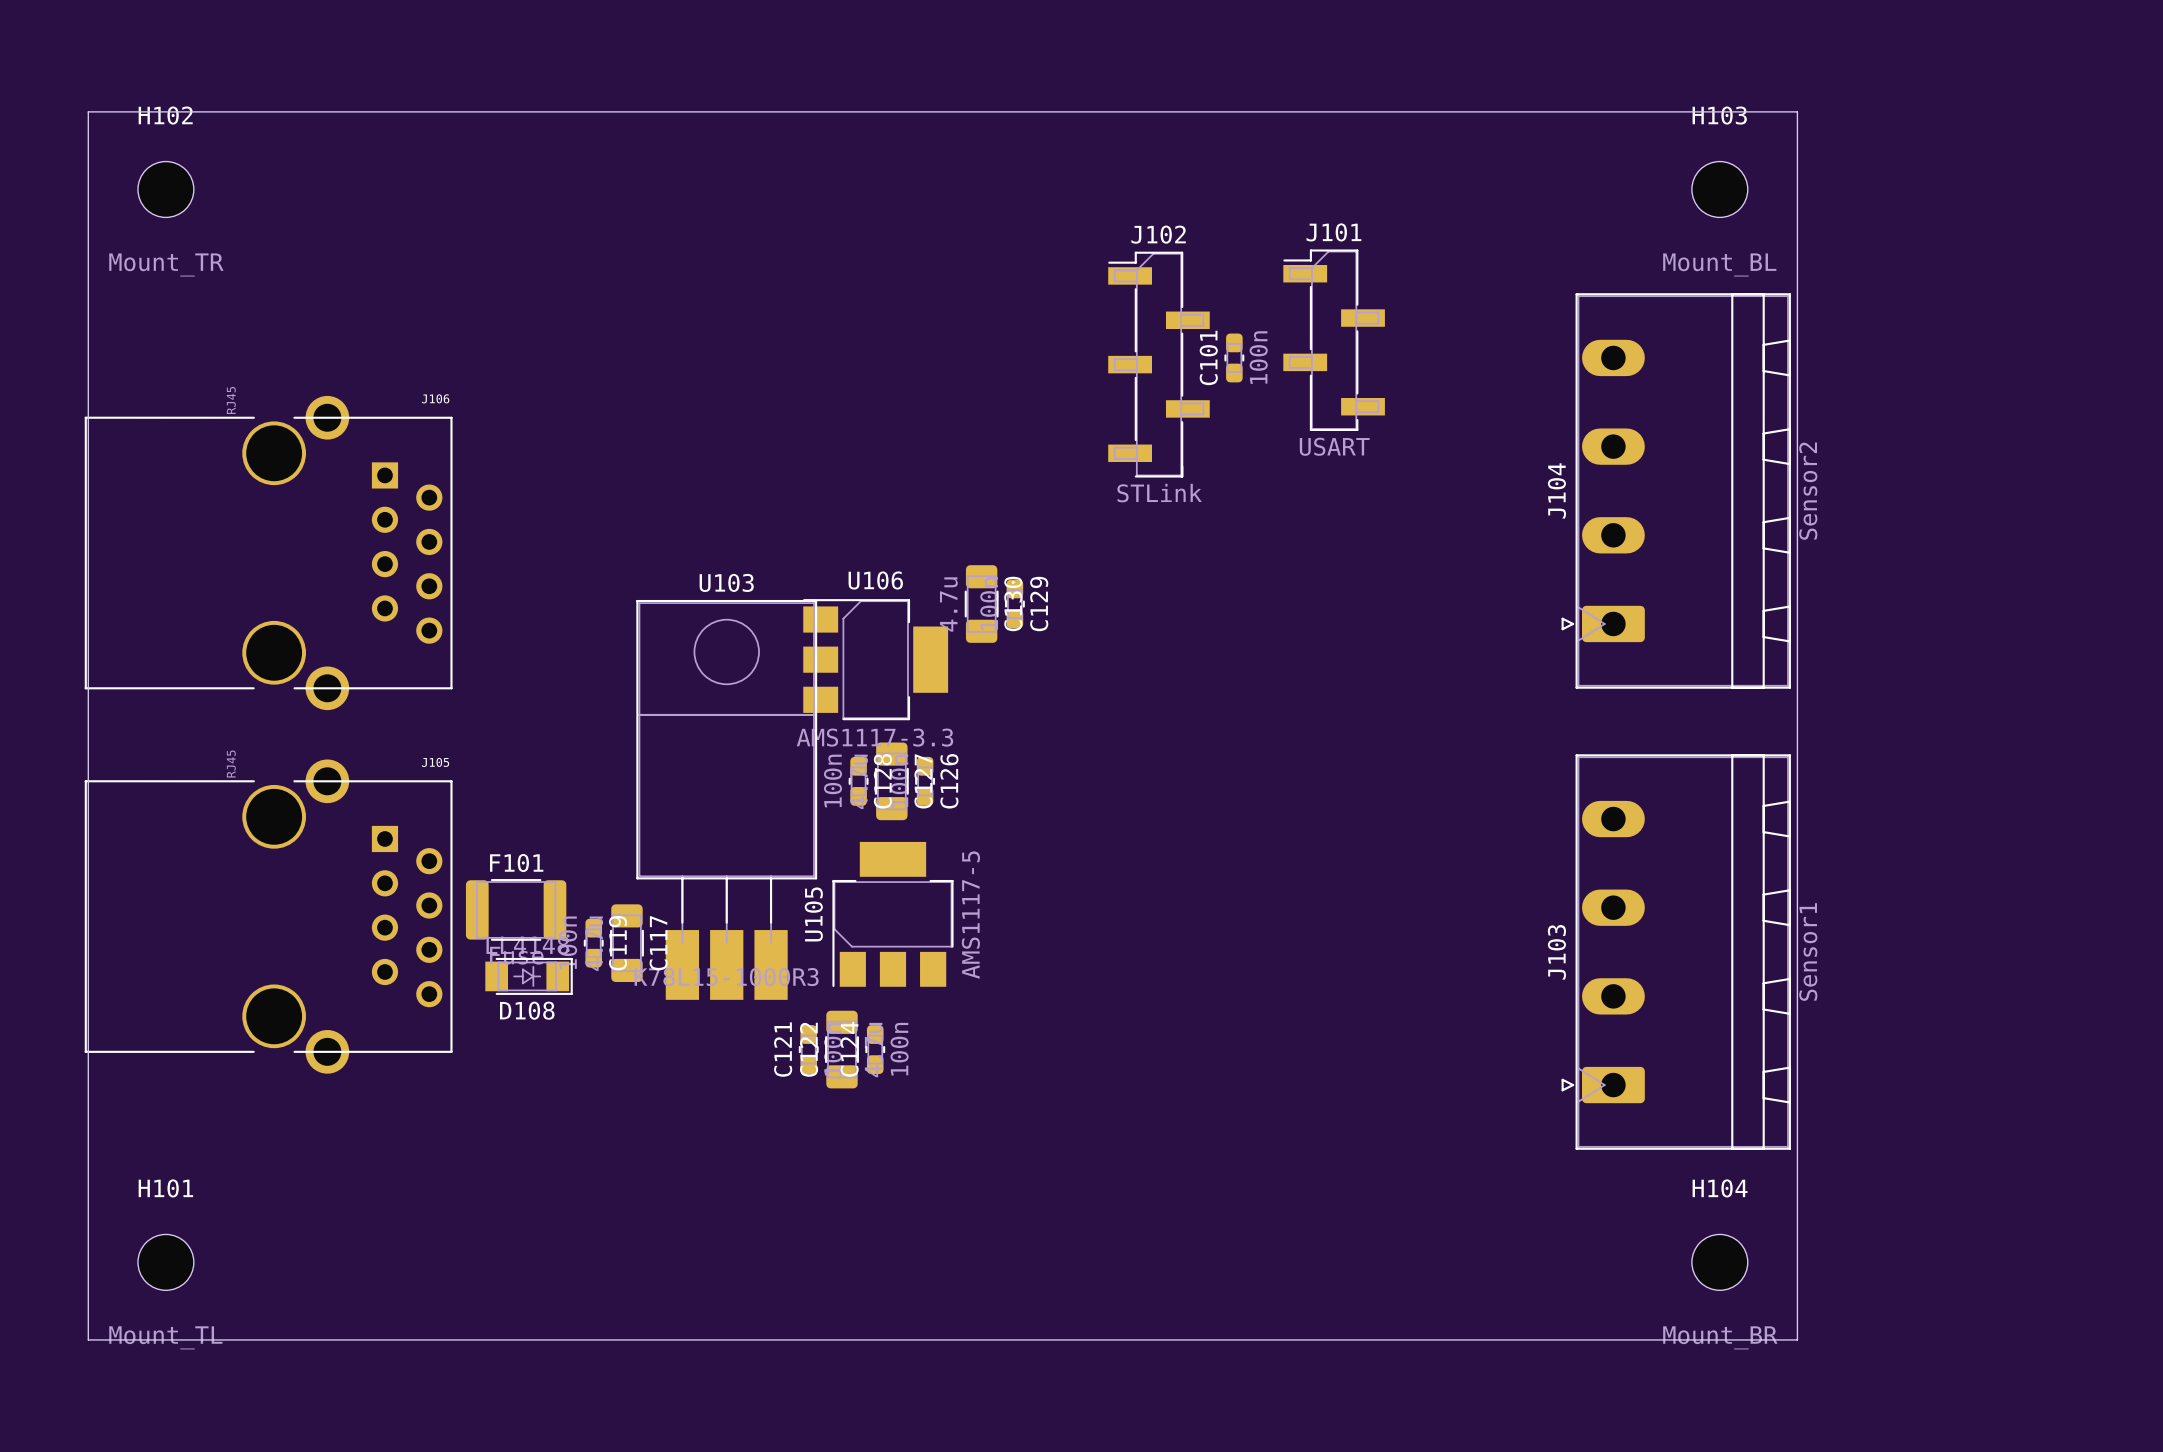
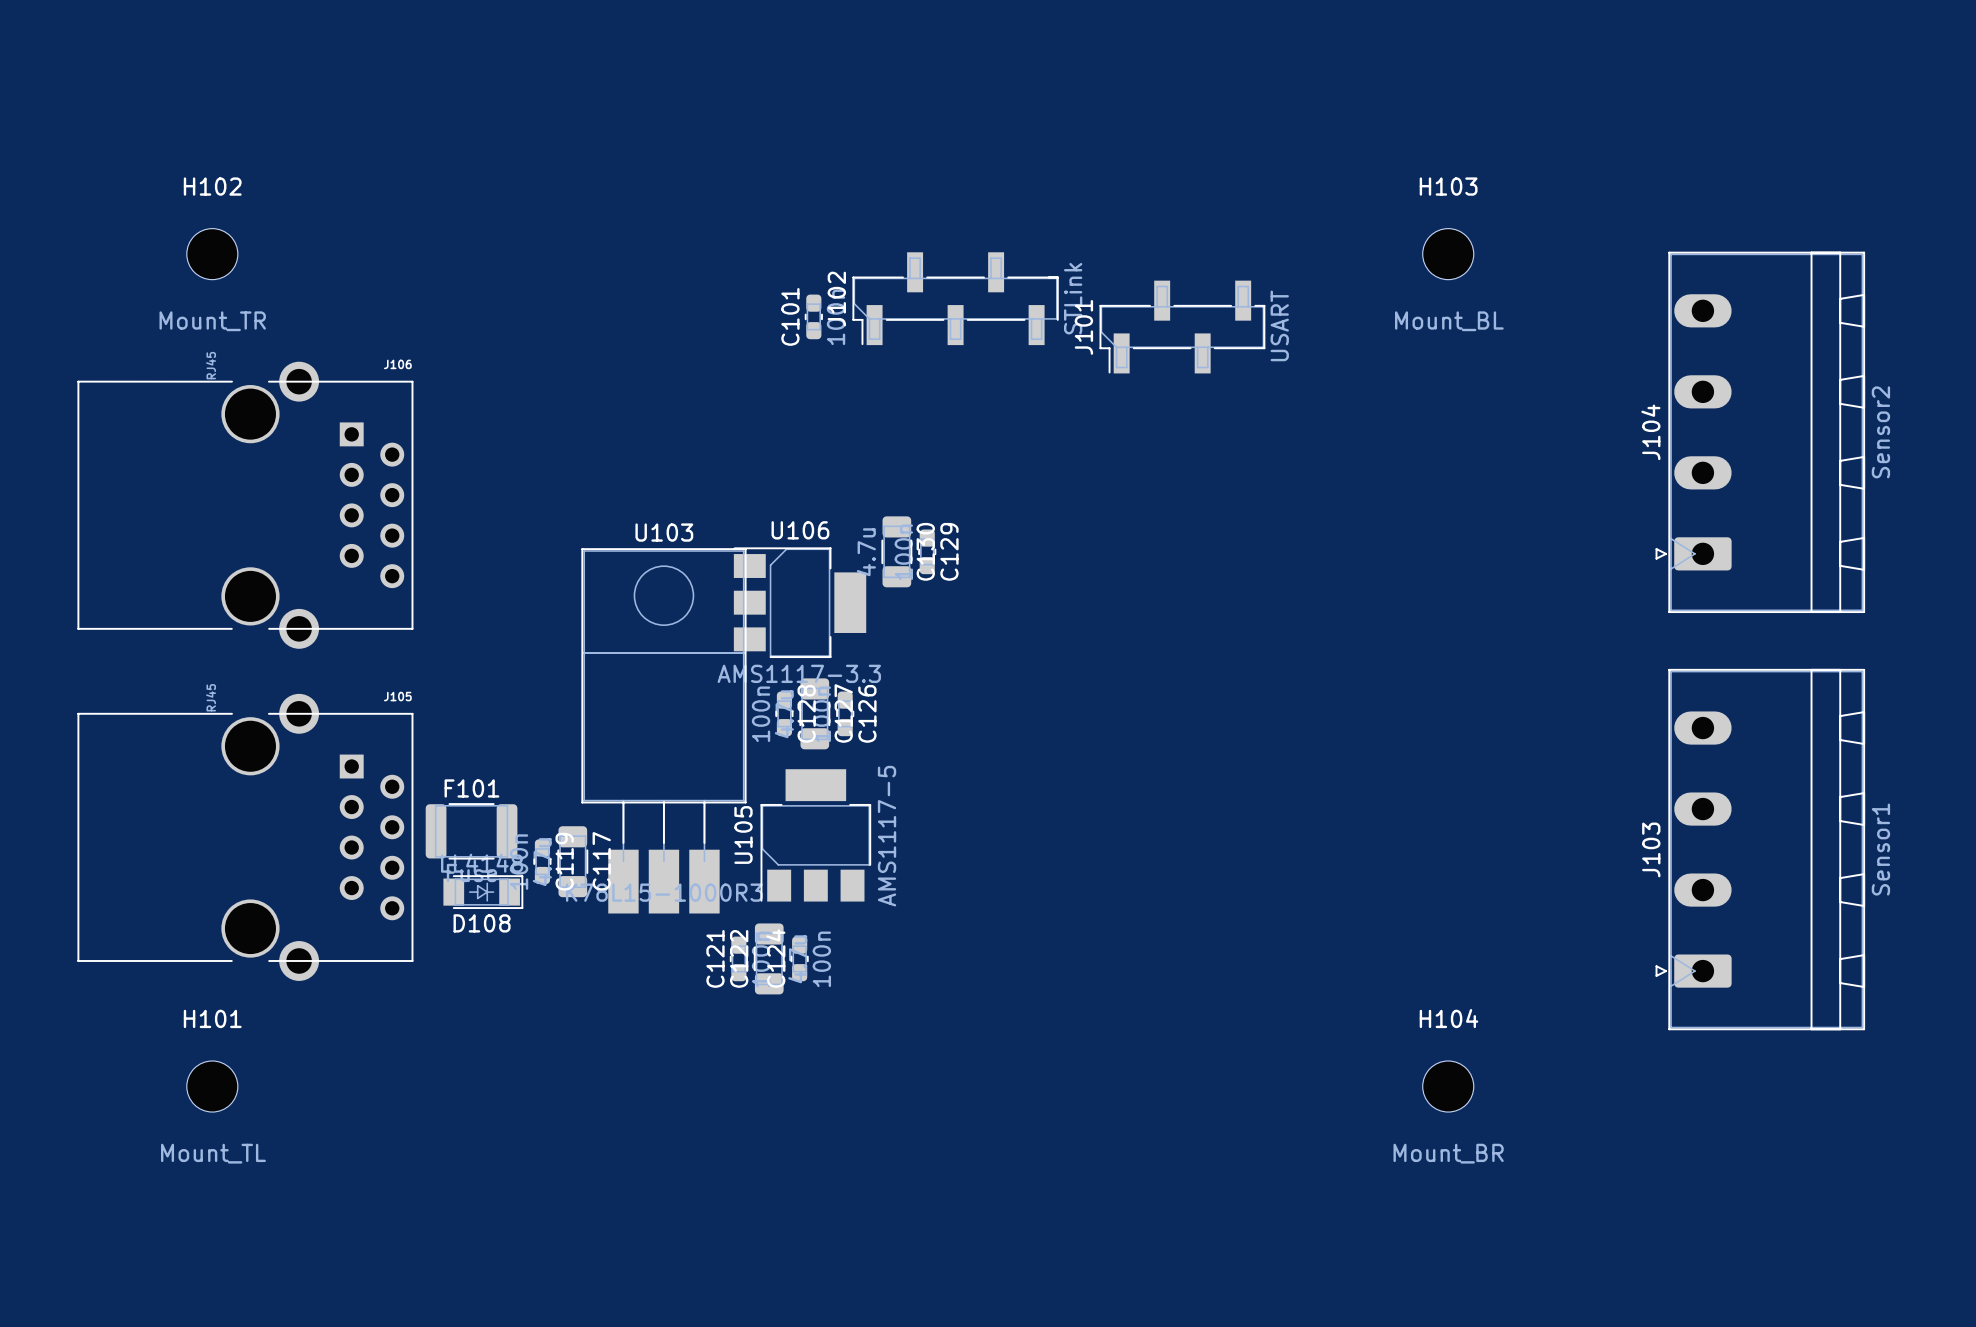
board edge: (88, 111) (88, 1339) (1797, 1339) (1797, 111) (88, 111) -> none
H102 position: (165, 189) -> (212, 254)
H103 position: (1719, 189) -> (1448, 254)
J101 rotation: 0° (1334, 340) -> 90° counterclockwise (1182, 327)
C101 position: (1234, 357) -> (813, 316)
J102 rotation: 0° (1158, 364) -> 90° counterclockwise (955, 298)
J104 position: (1676, 490) -> (1760, 432)
J103 position: (1676, 952) -> (1760, 849)
H101 position: (165, 1262) -> (212, 1086)
H104 position: (1719, 1262) -> (1448, 1086)

